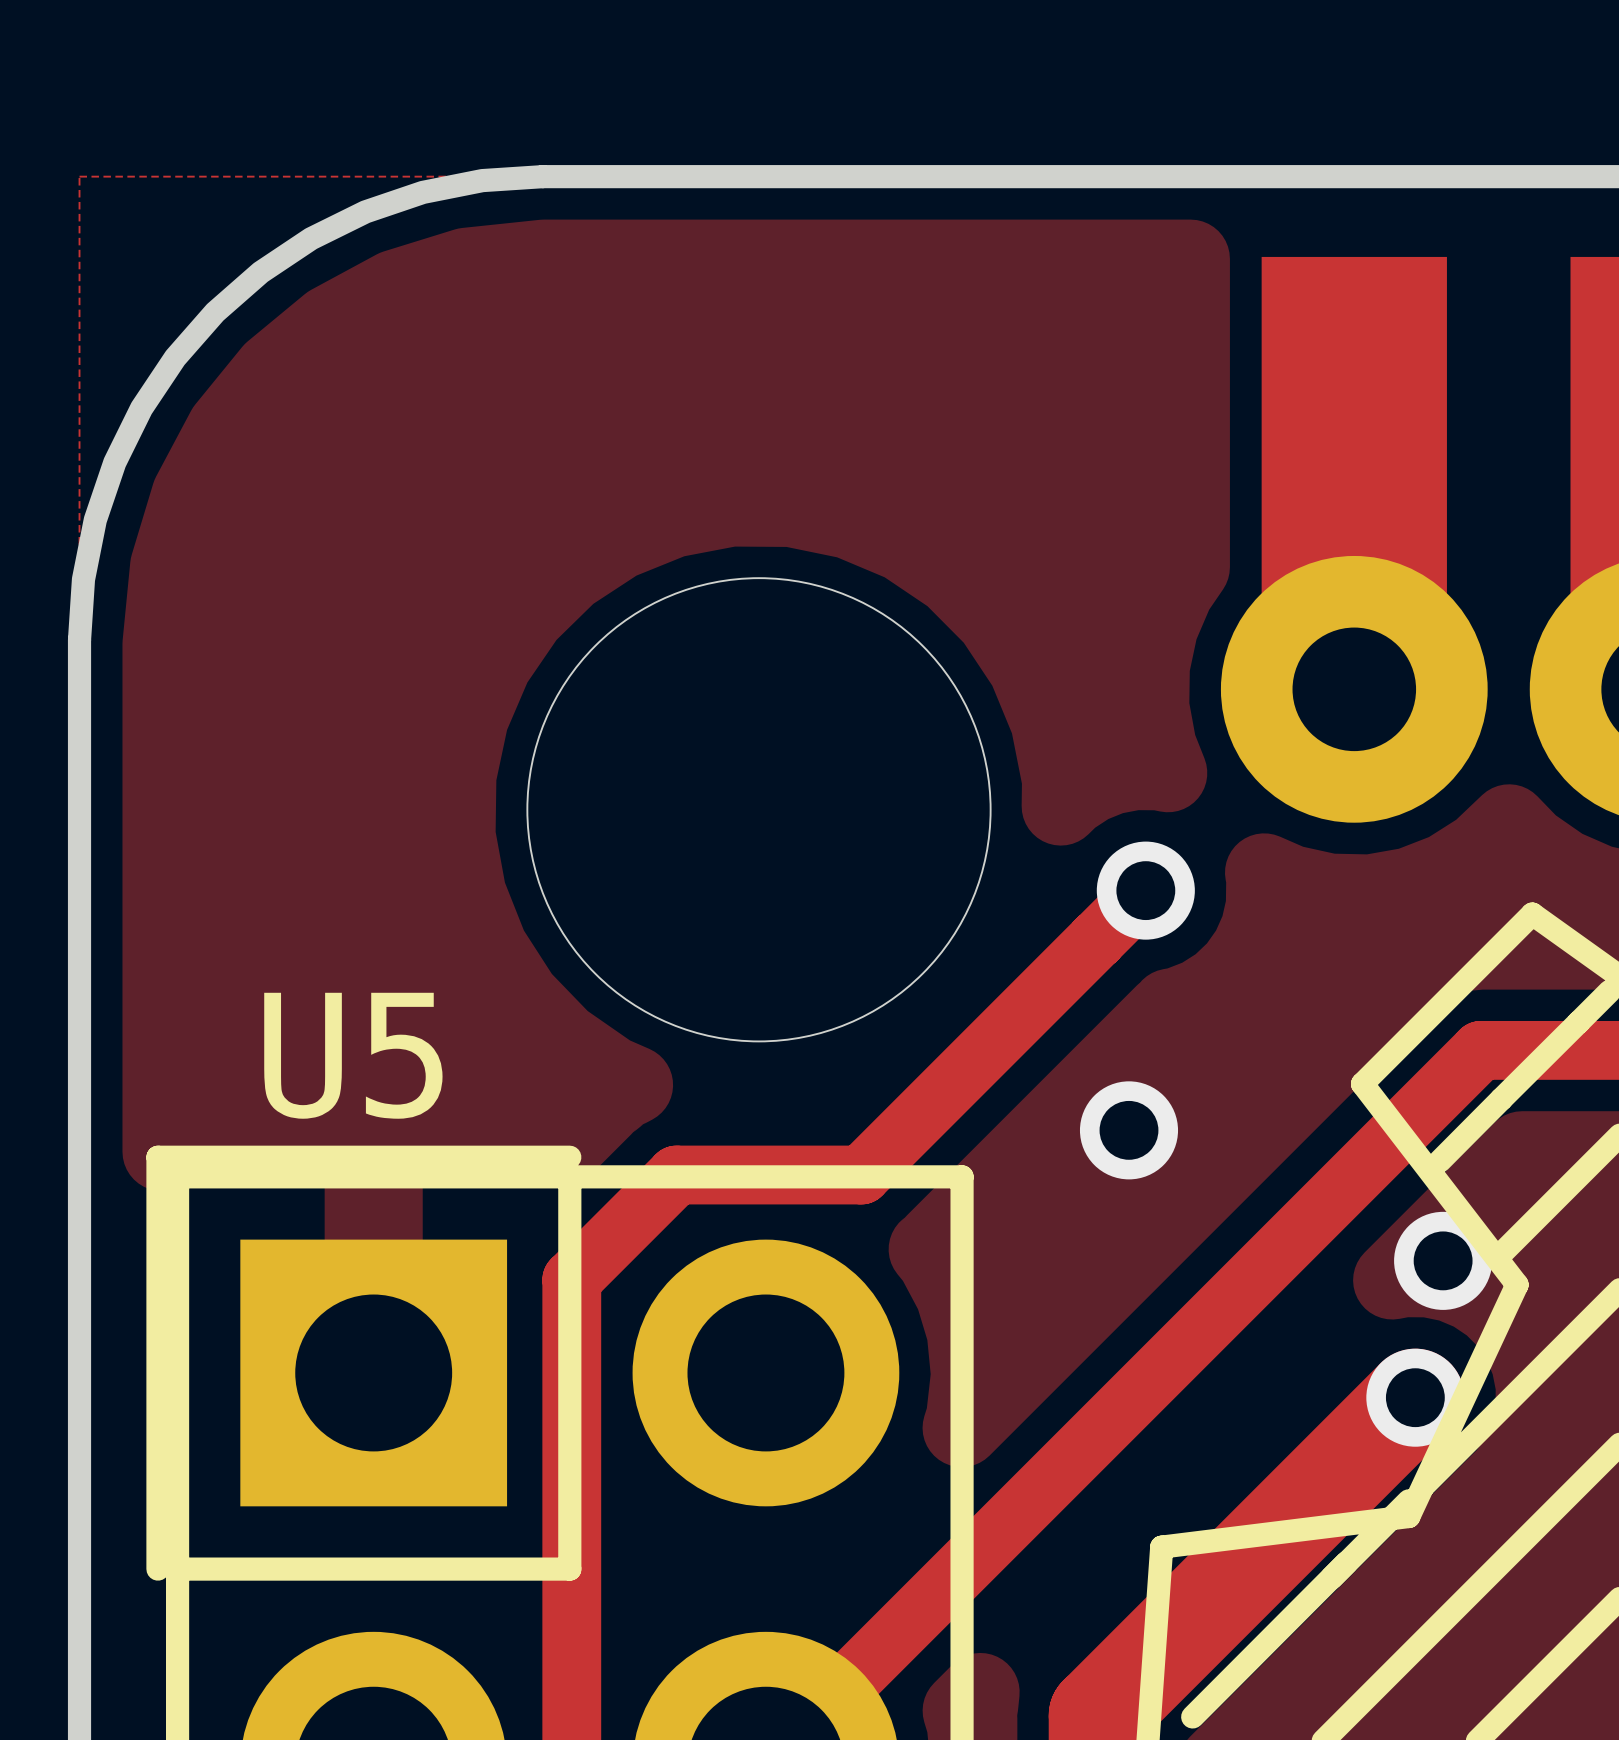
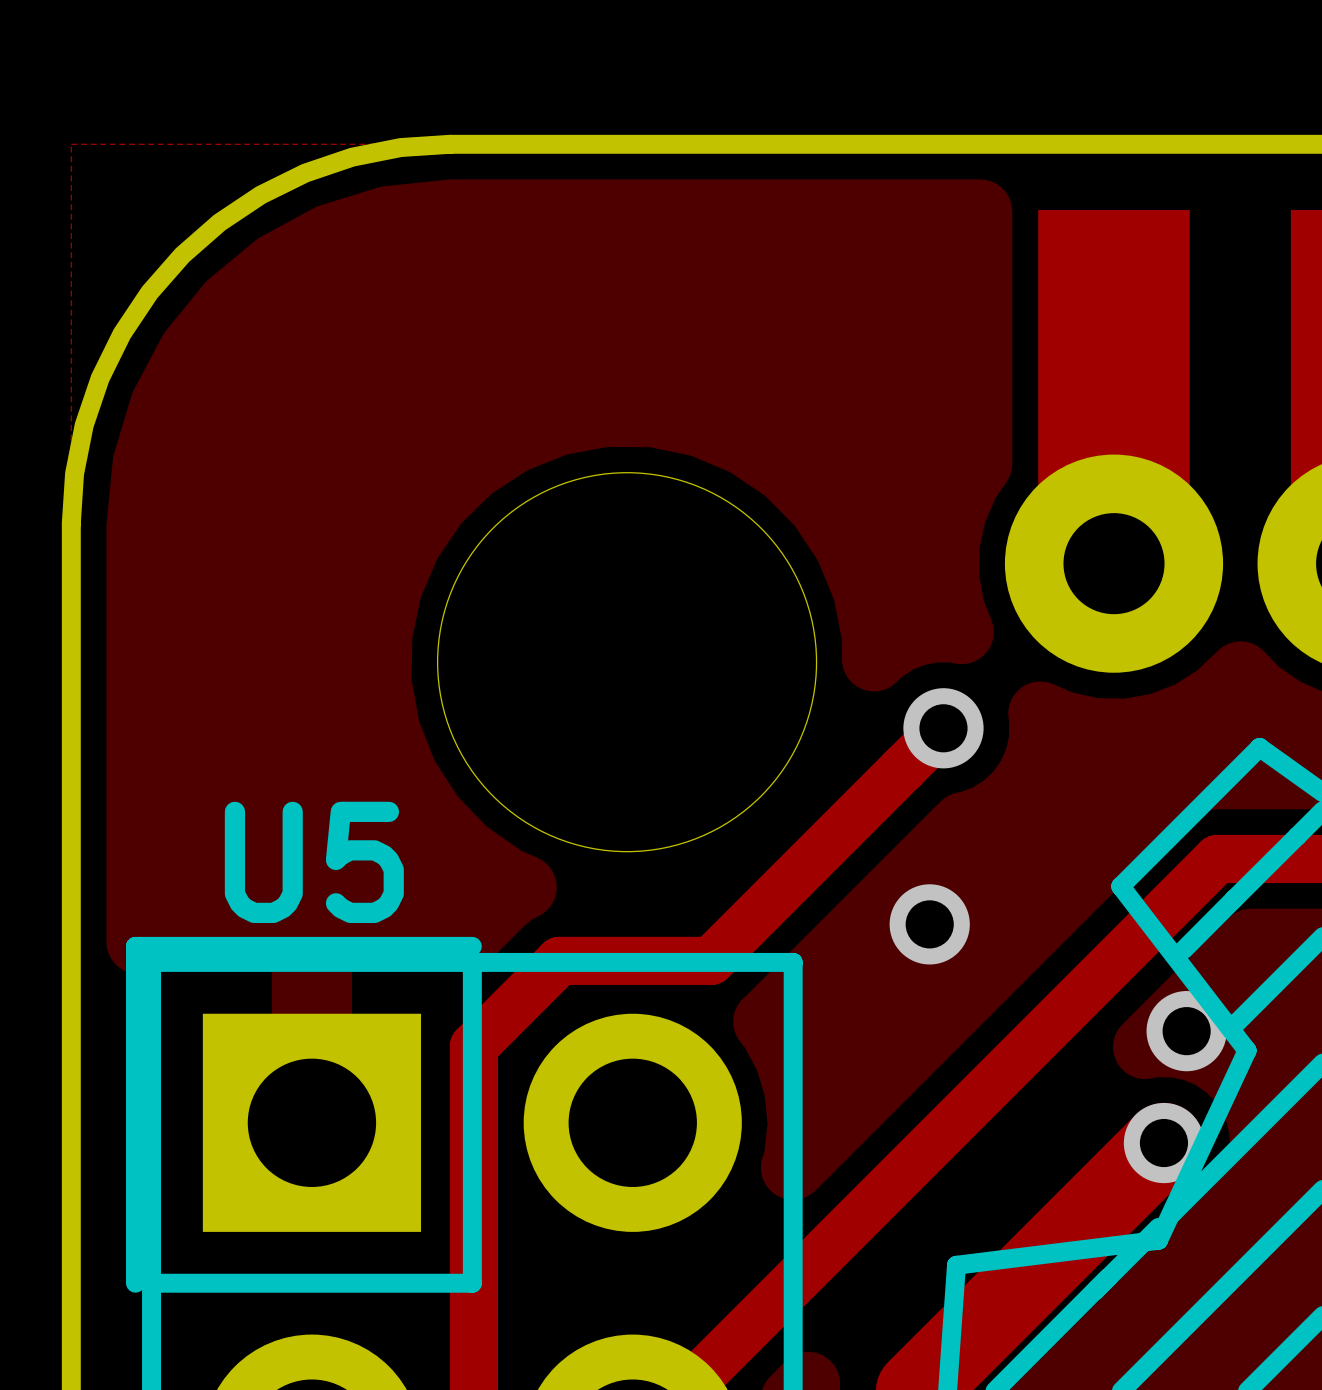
U5 name position: U5 (353, 1055) -> U5 (314, 862)

